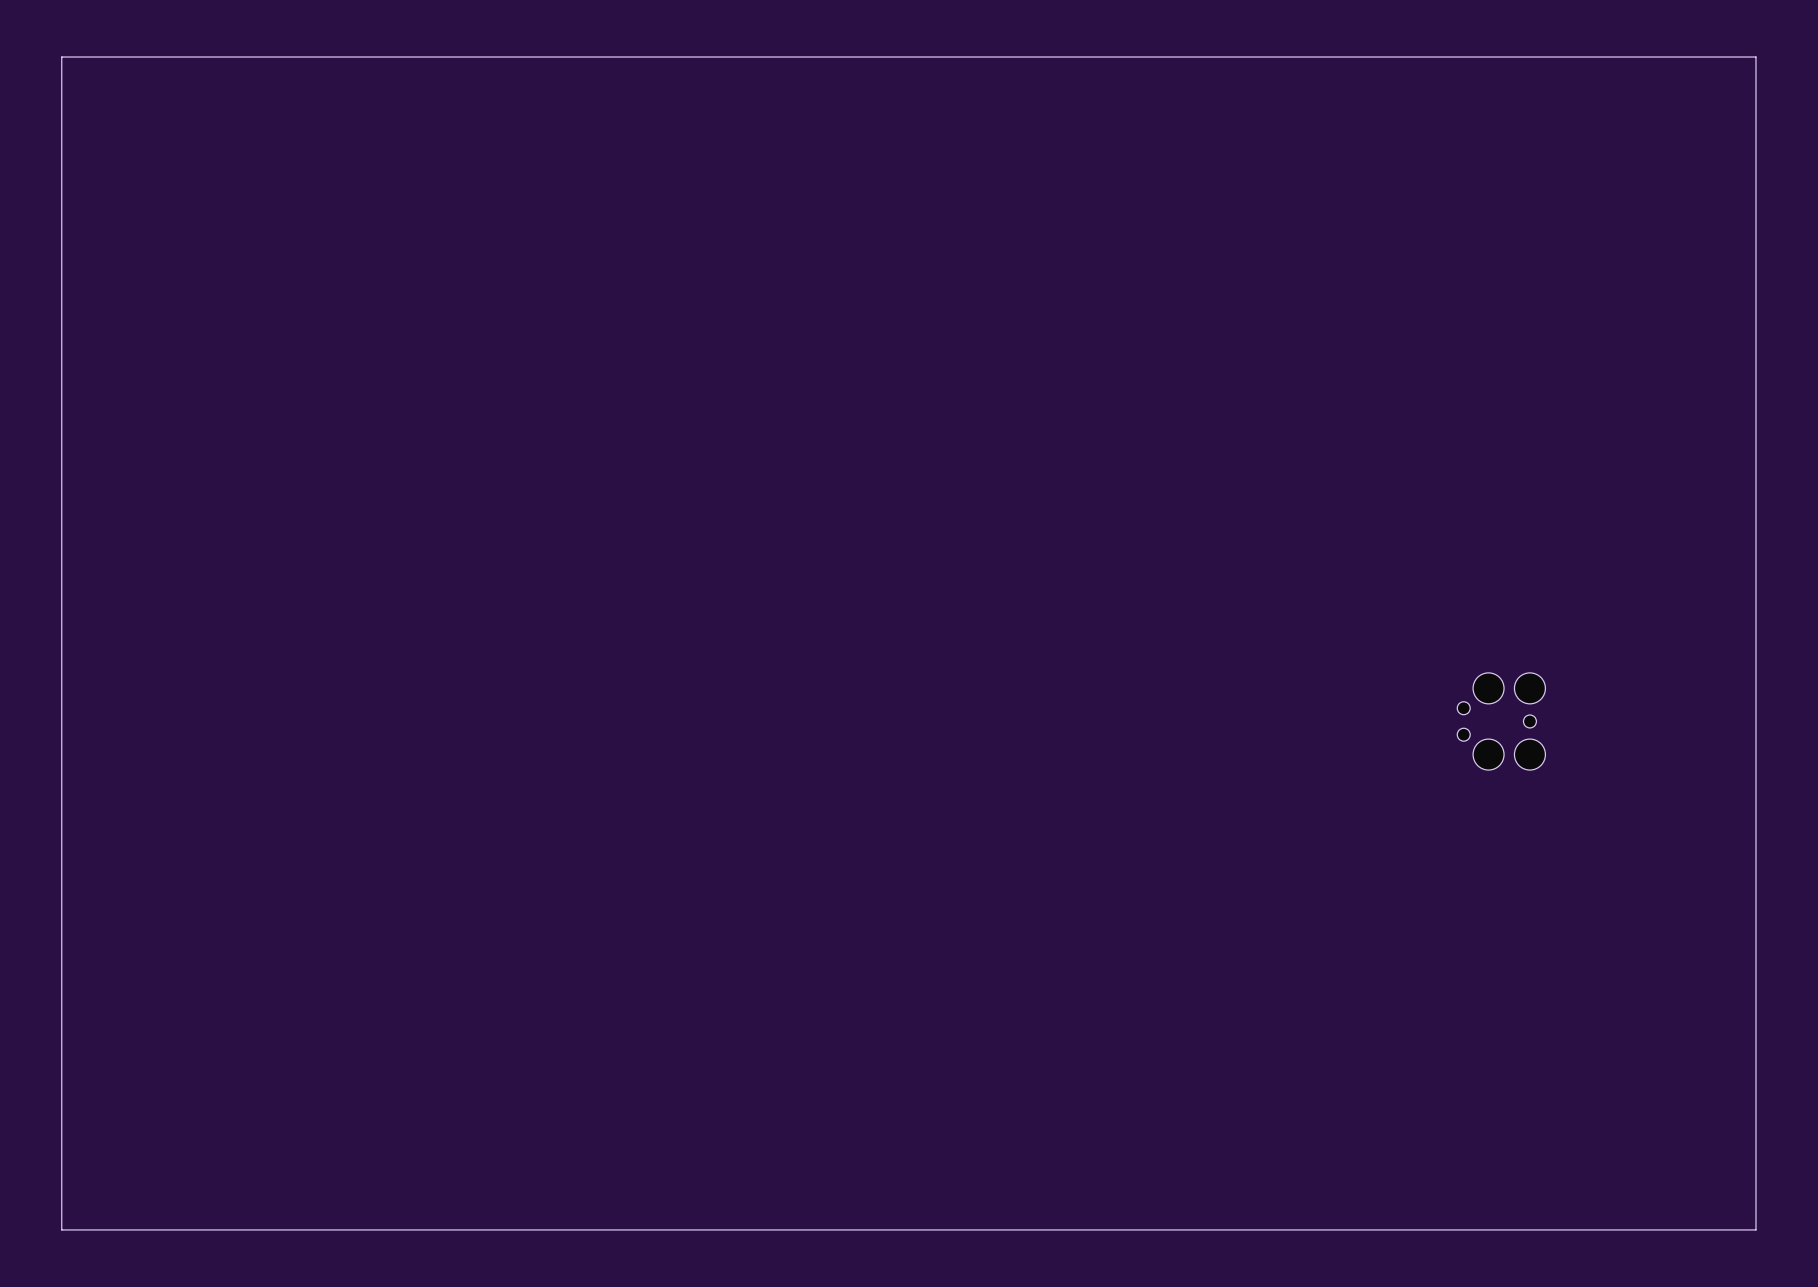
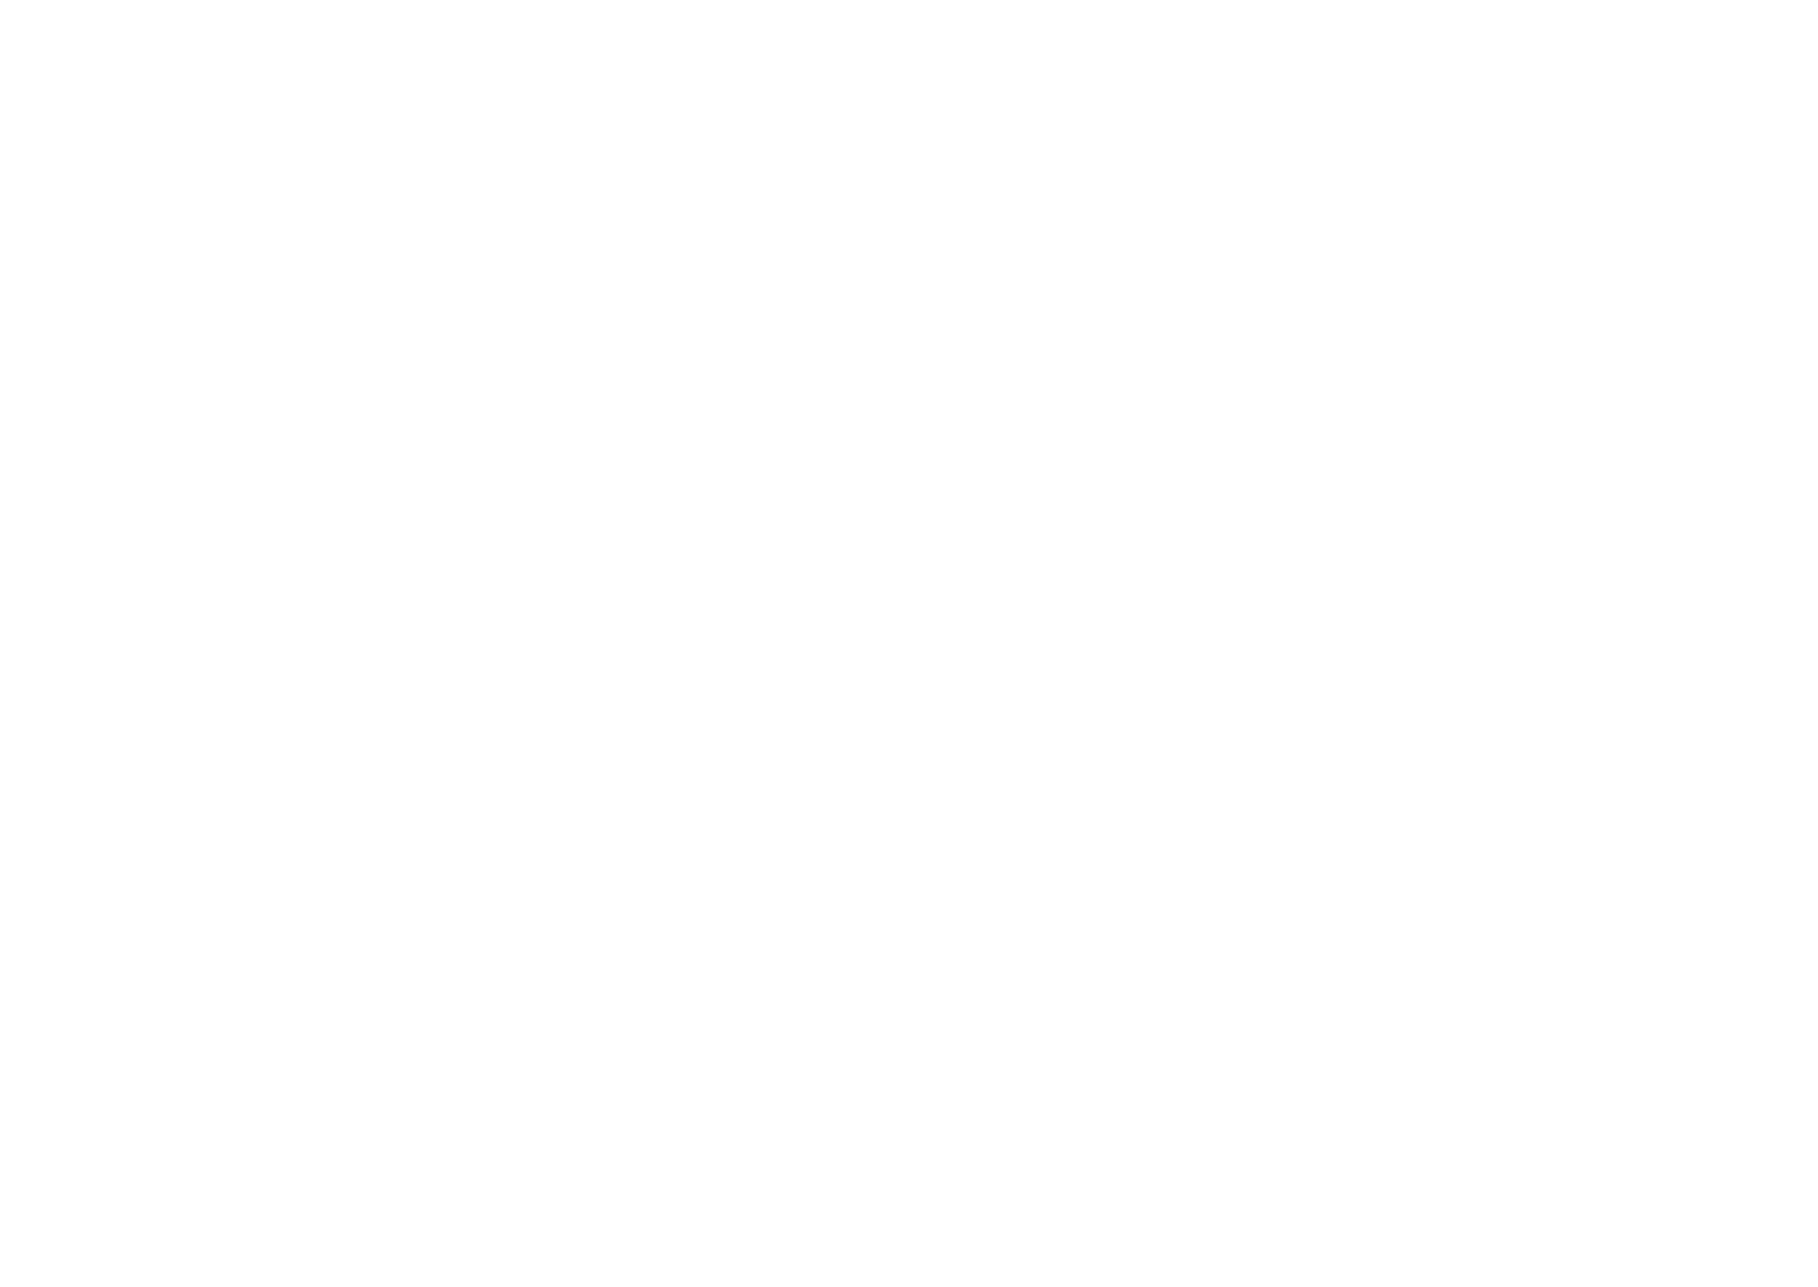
board edge: (1755, 57) (61, 57) (61, 1229) (1755, 1229) (1755, 57) -> none
part: (1501, 721) -> none

